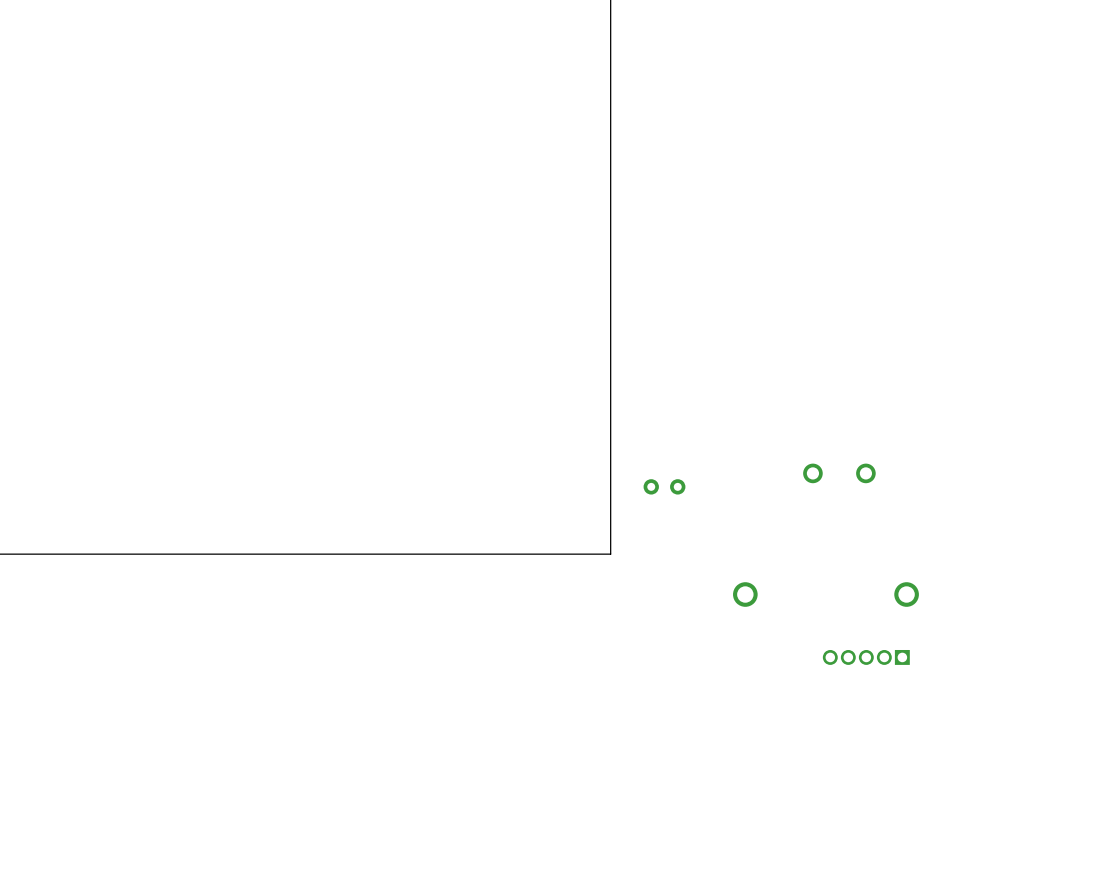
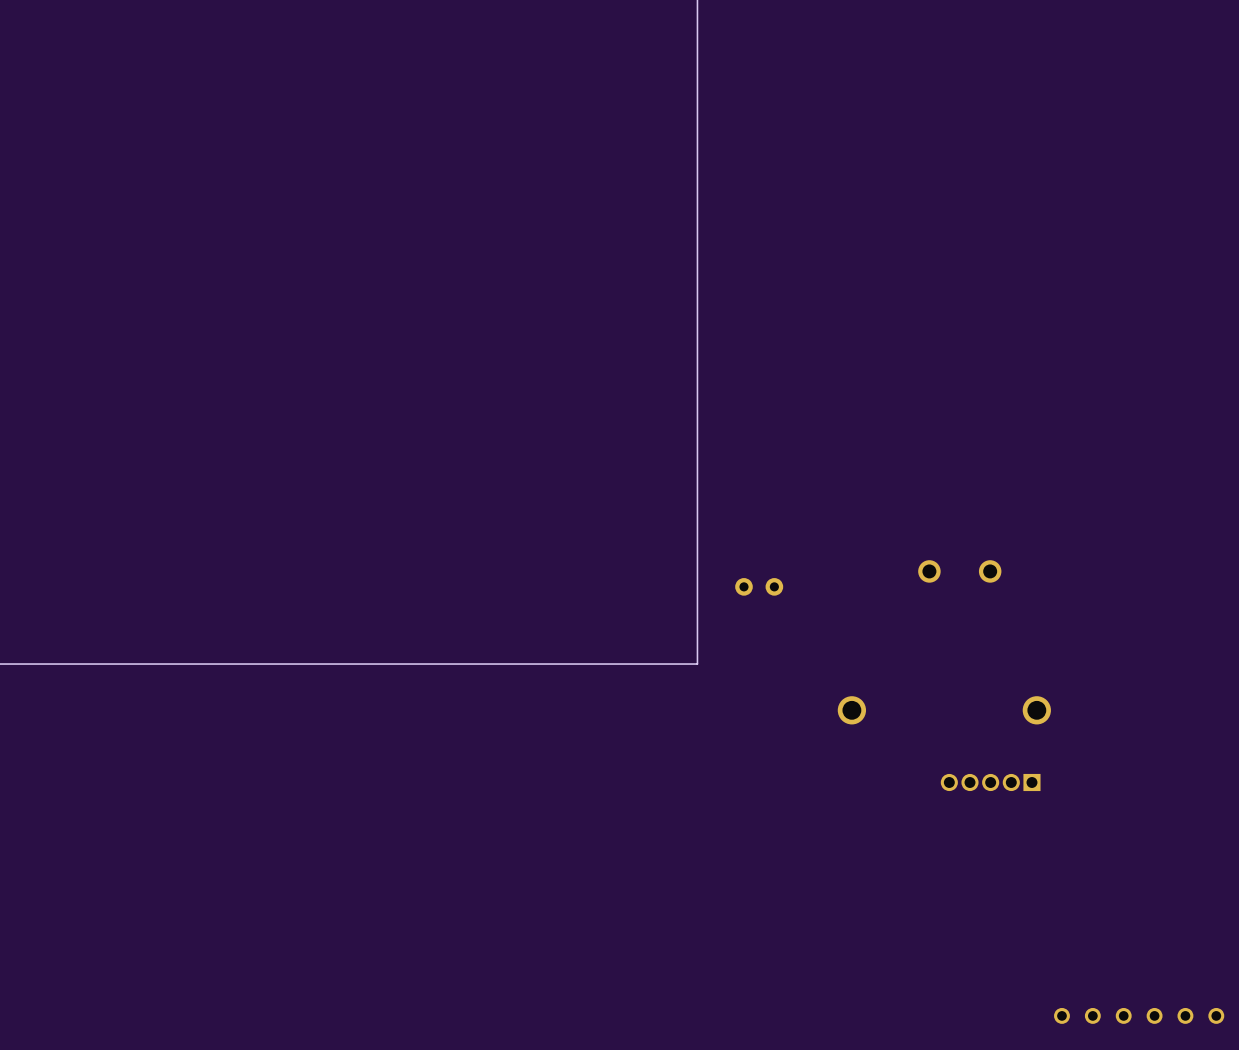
part: none -> (1139, 1015)

